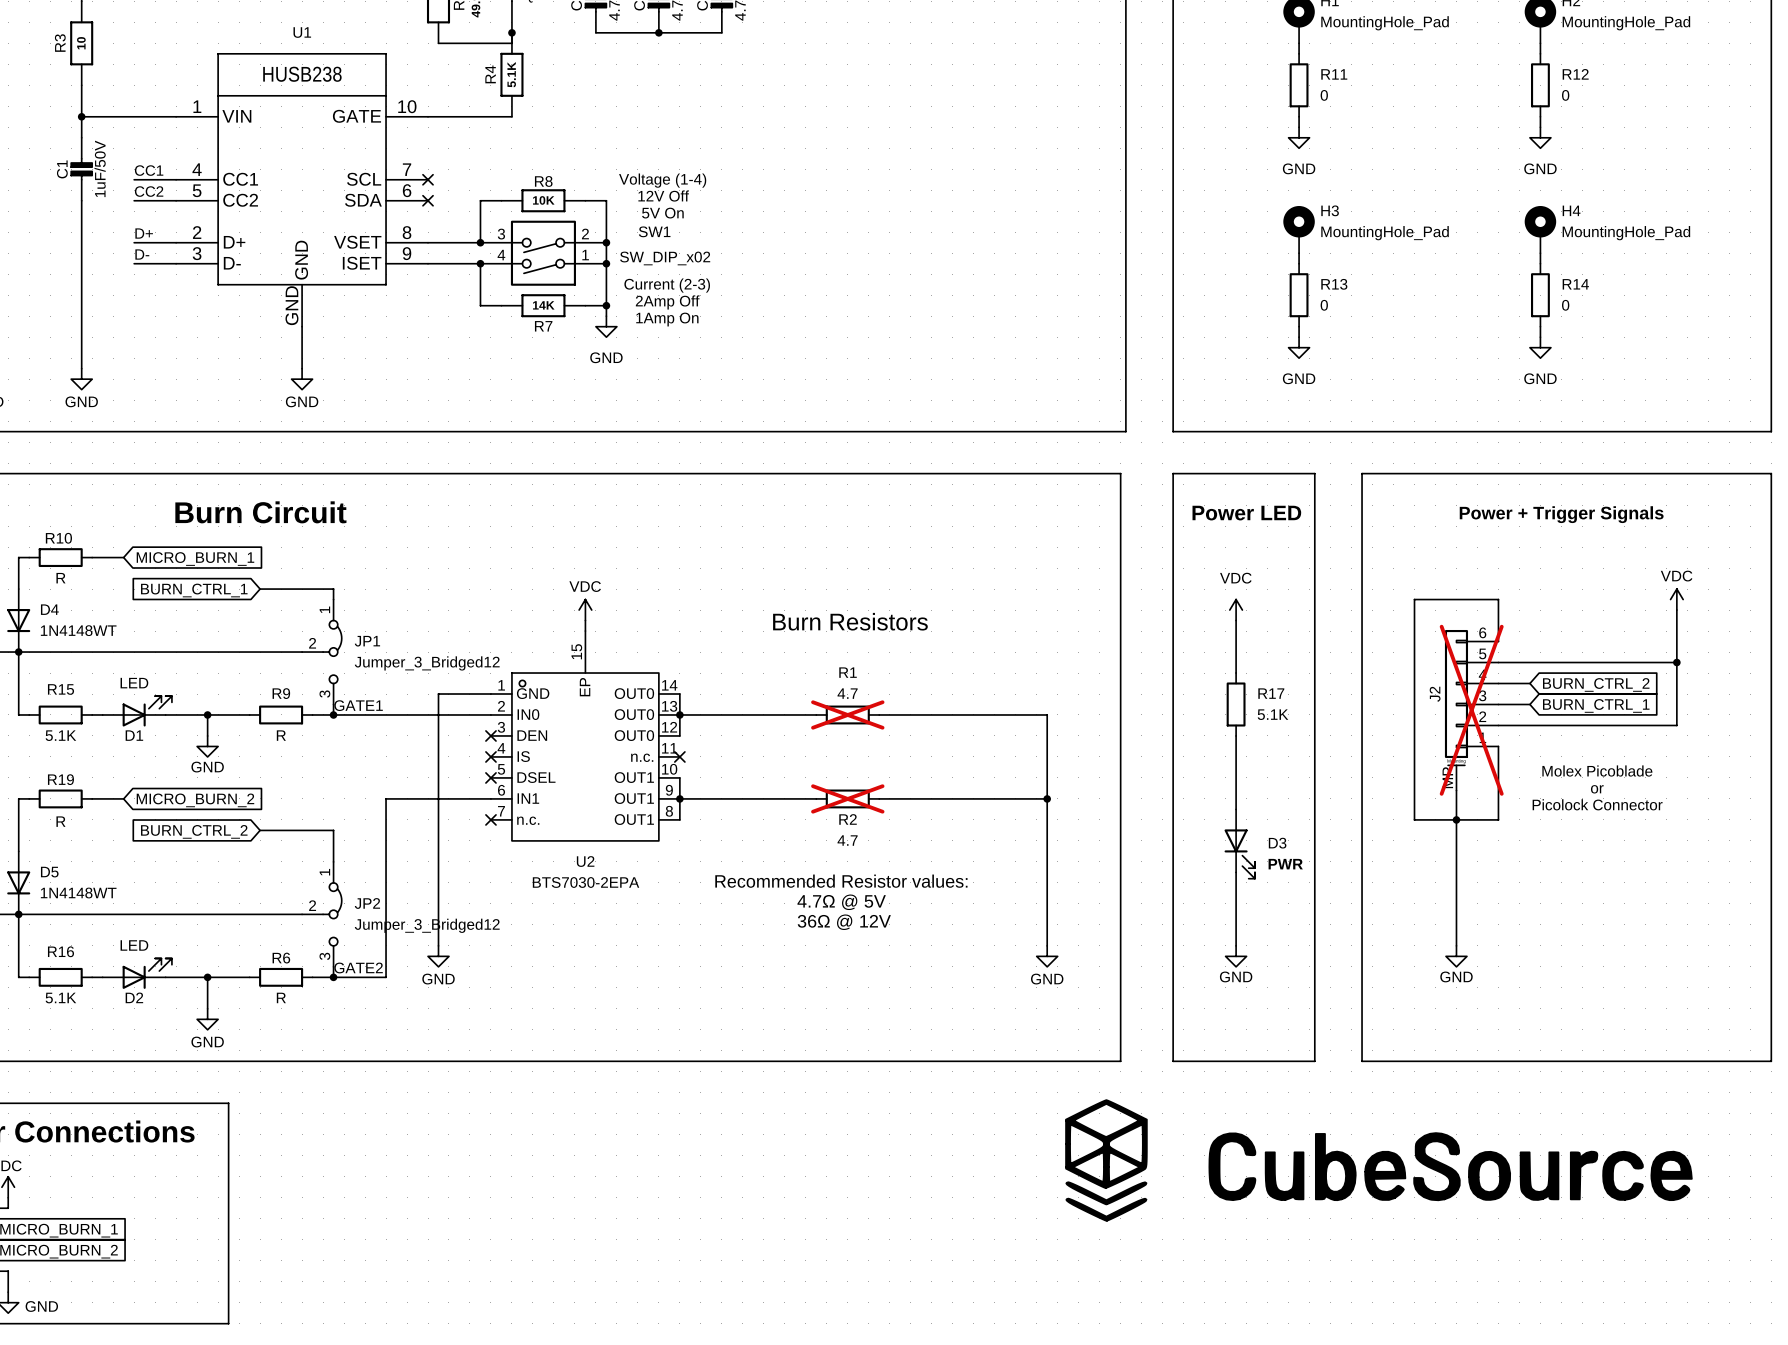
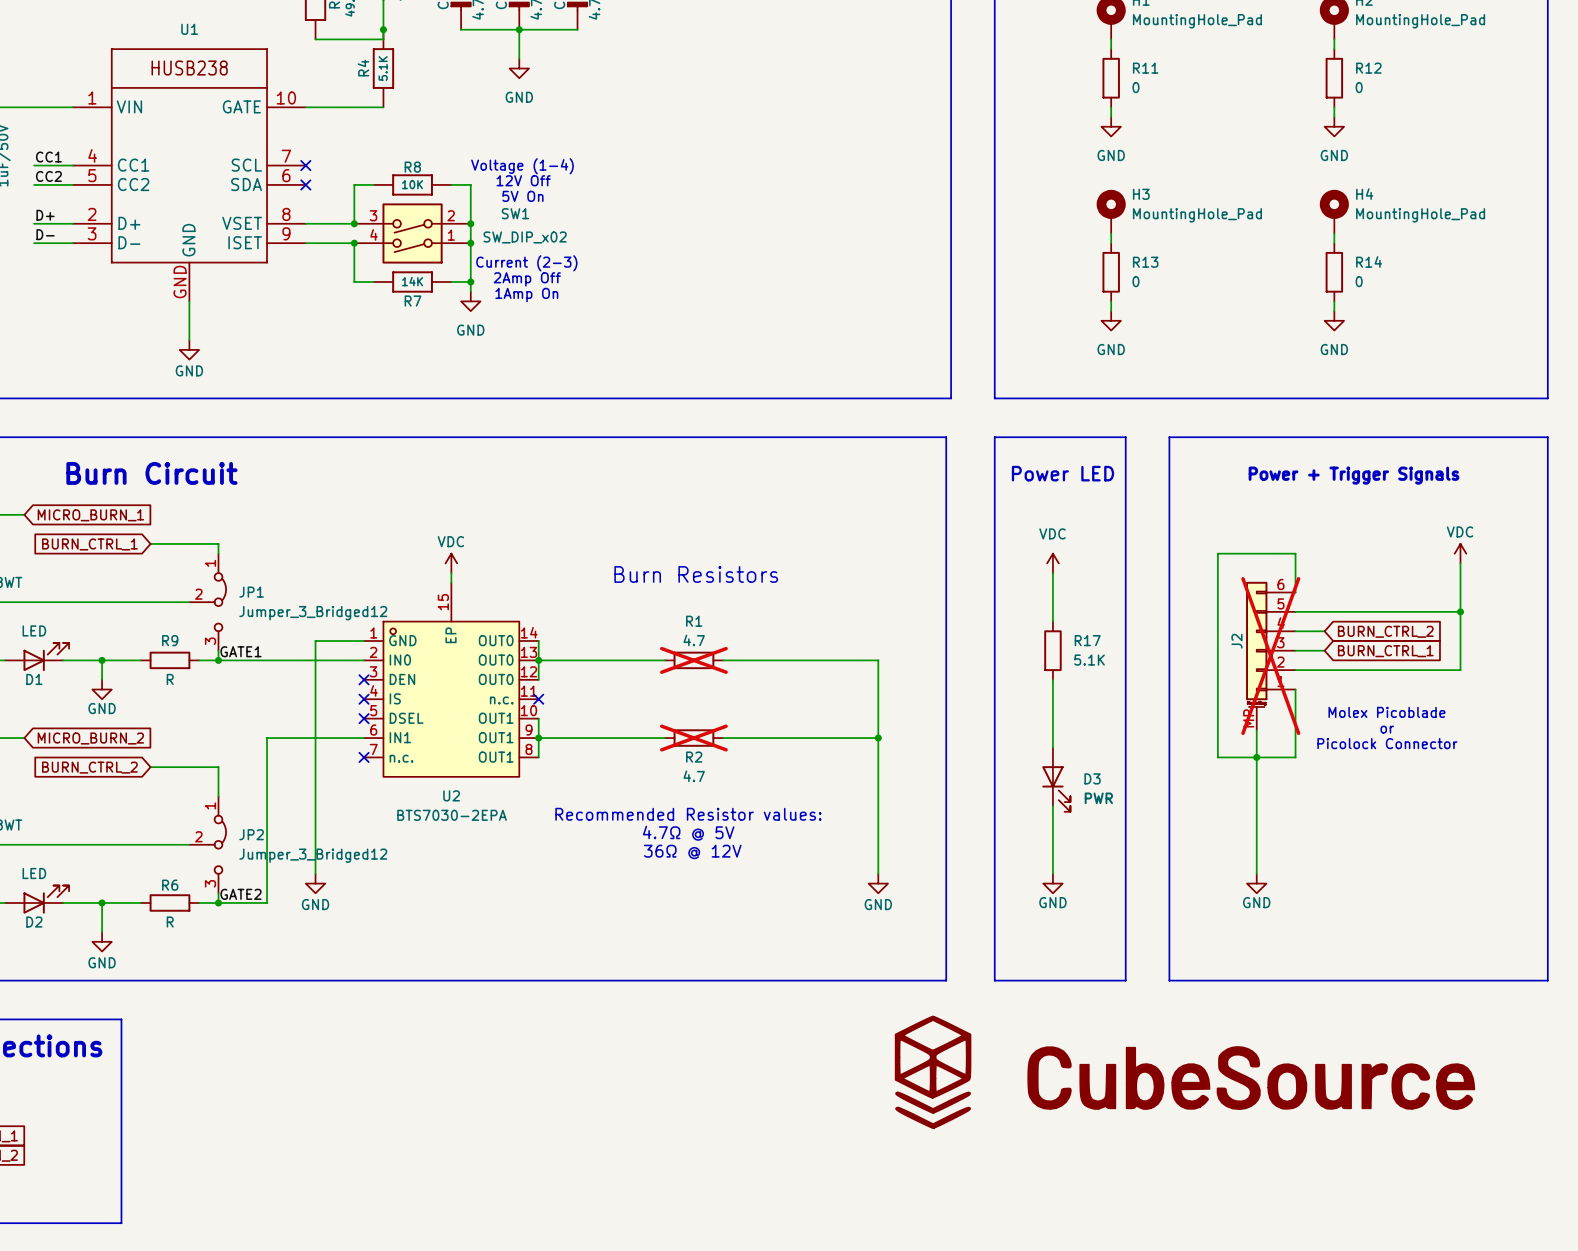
wire: none -> (519, 29) (519, 58)
power symbol: none -> GND (519, 68)

